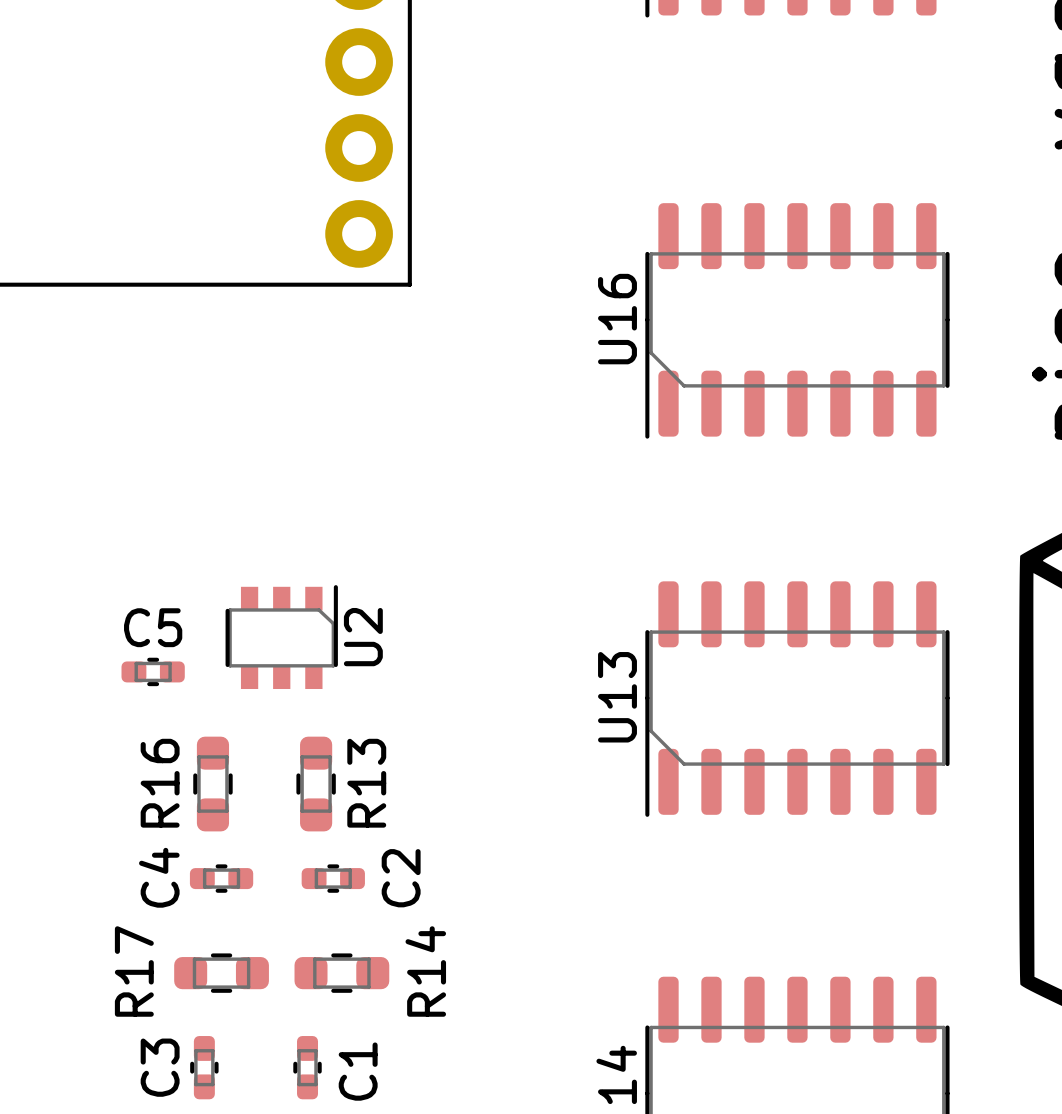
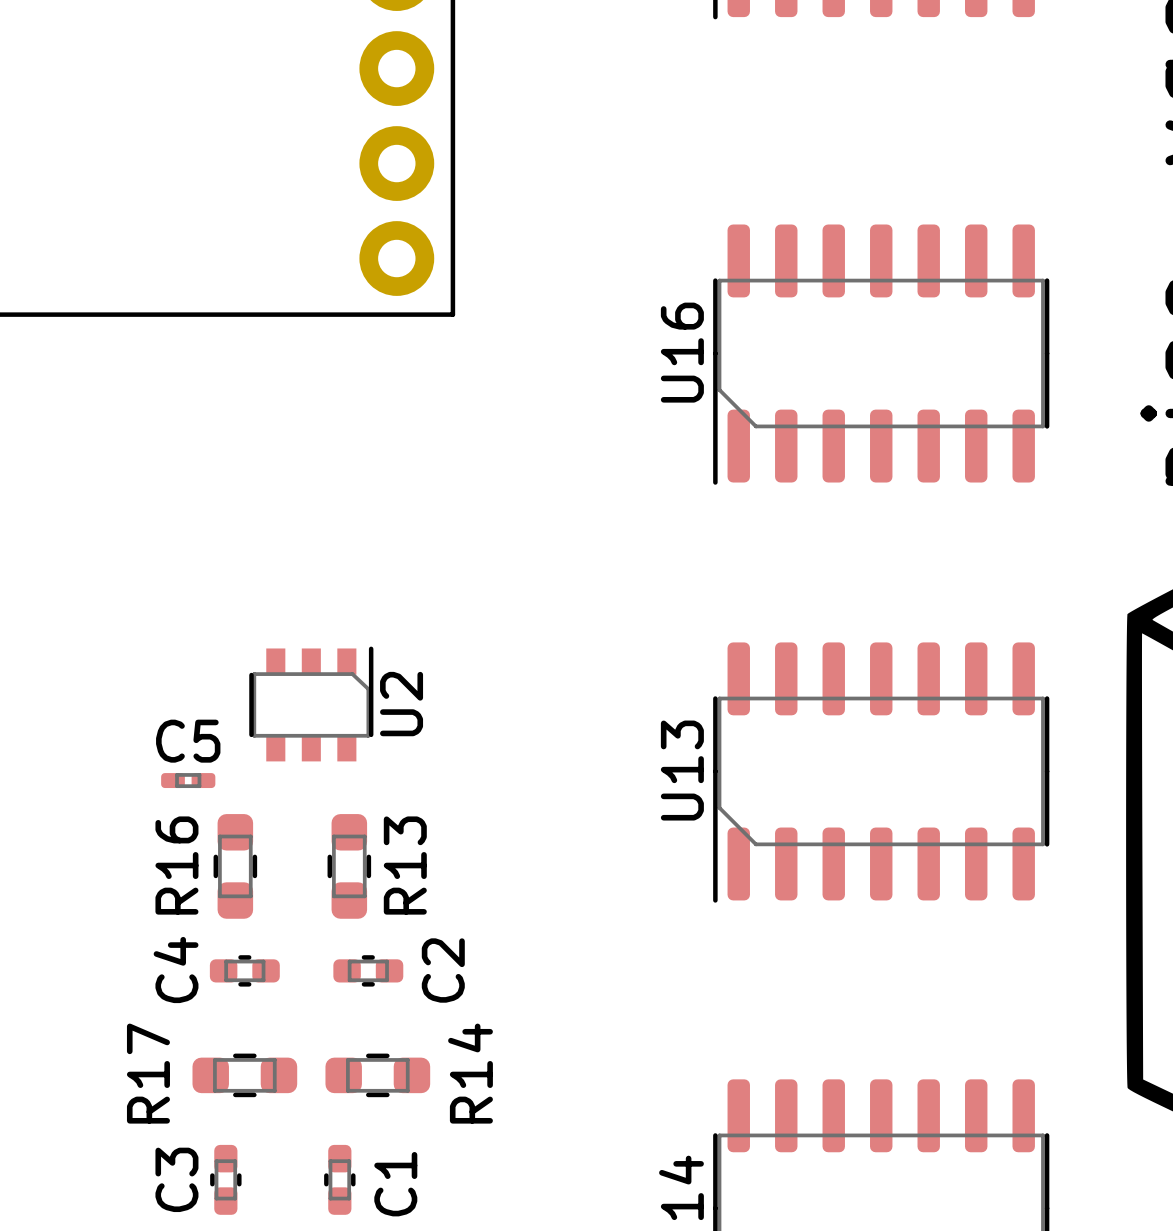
C5 footprint: [121, 657, 185, 687] -> [161, 773, 216, 789]

